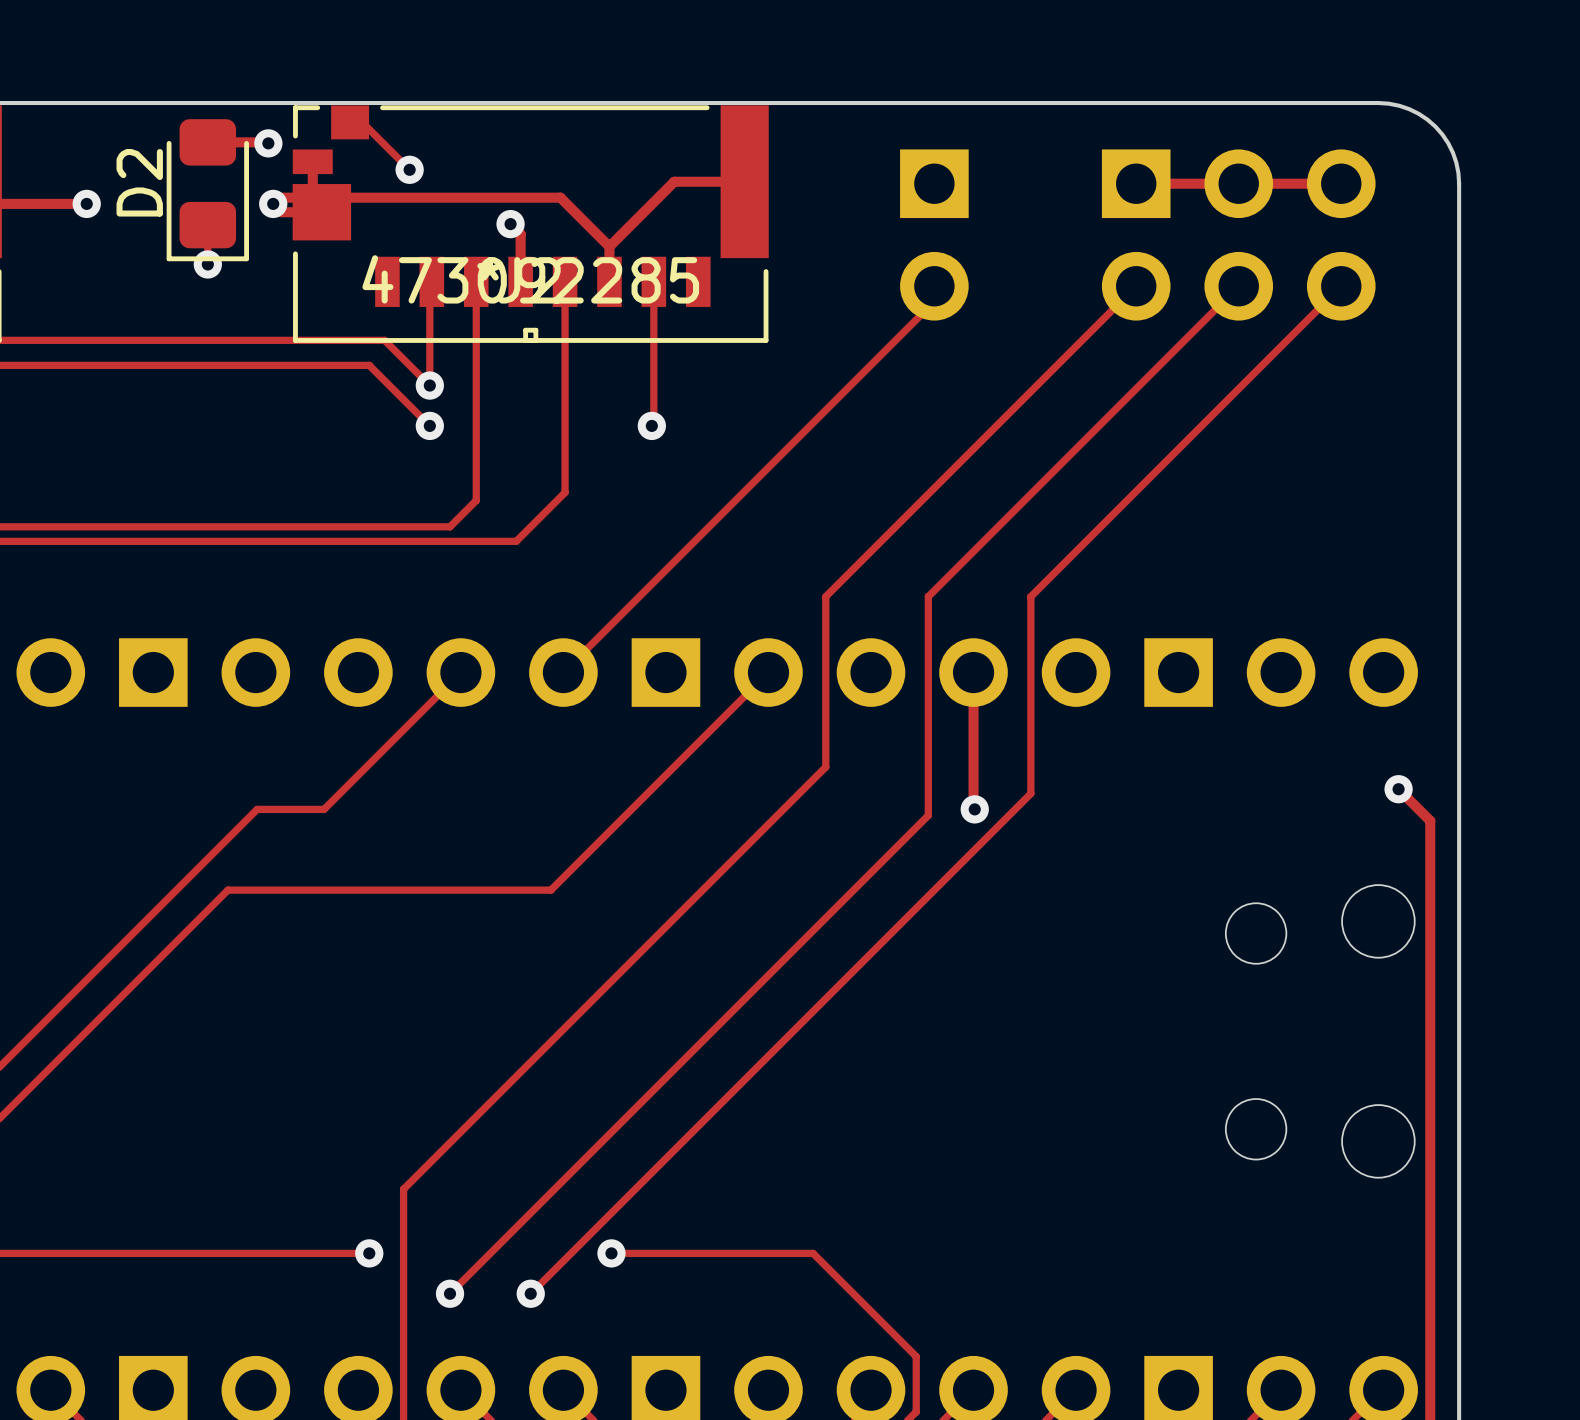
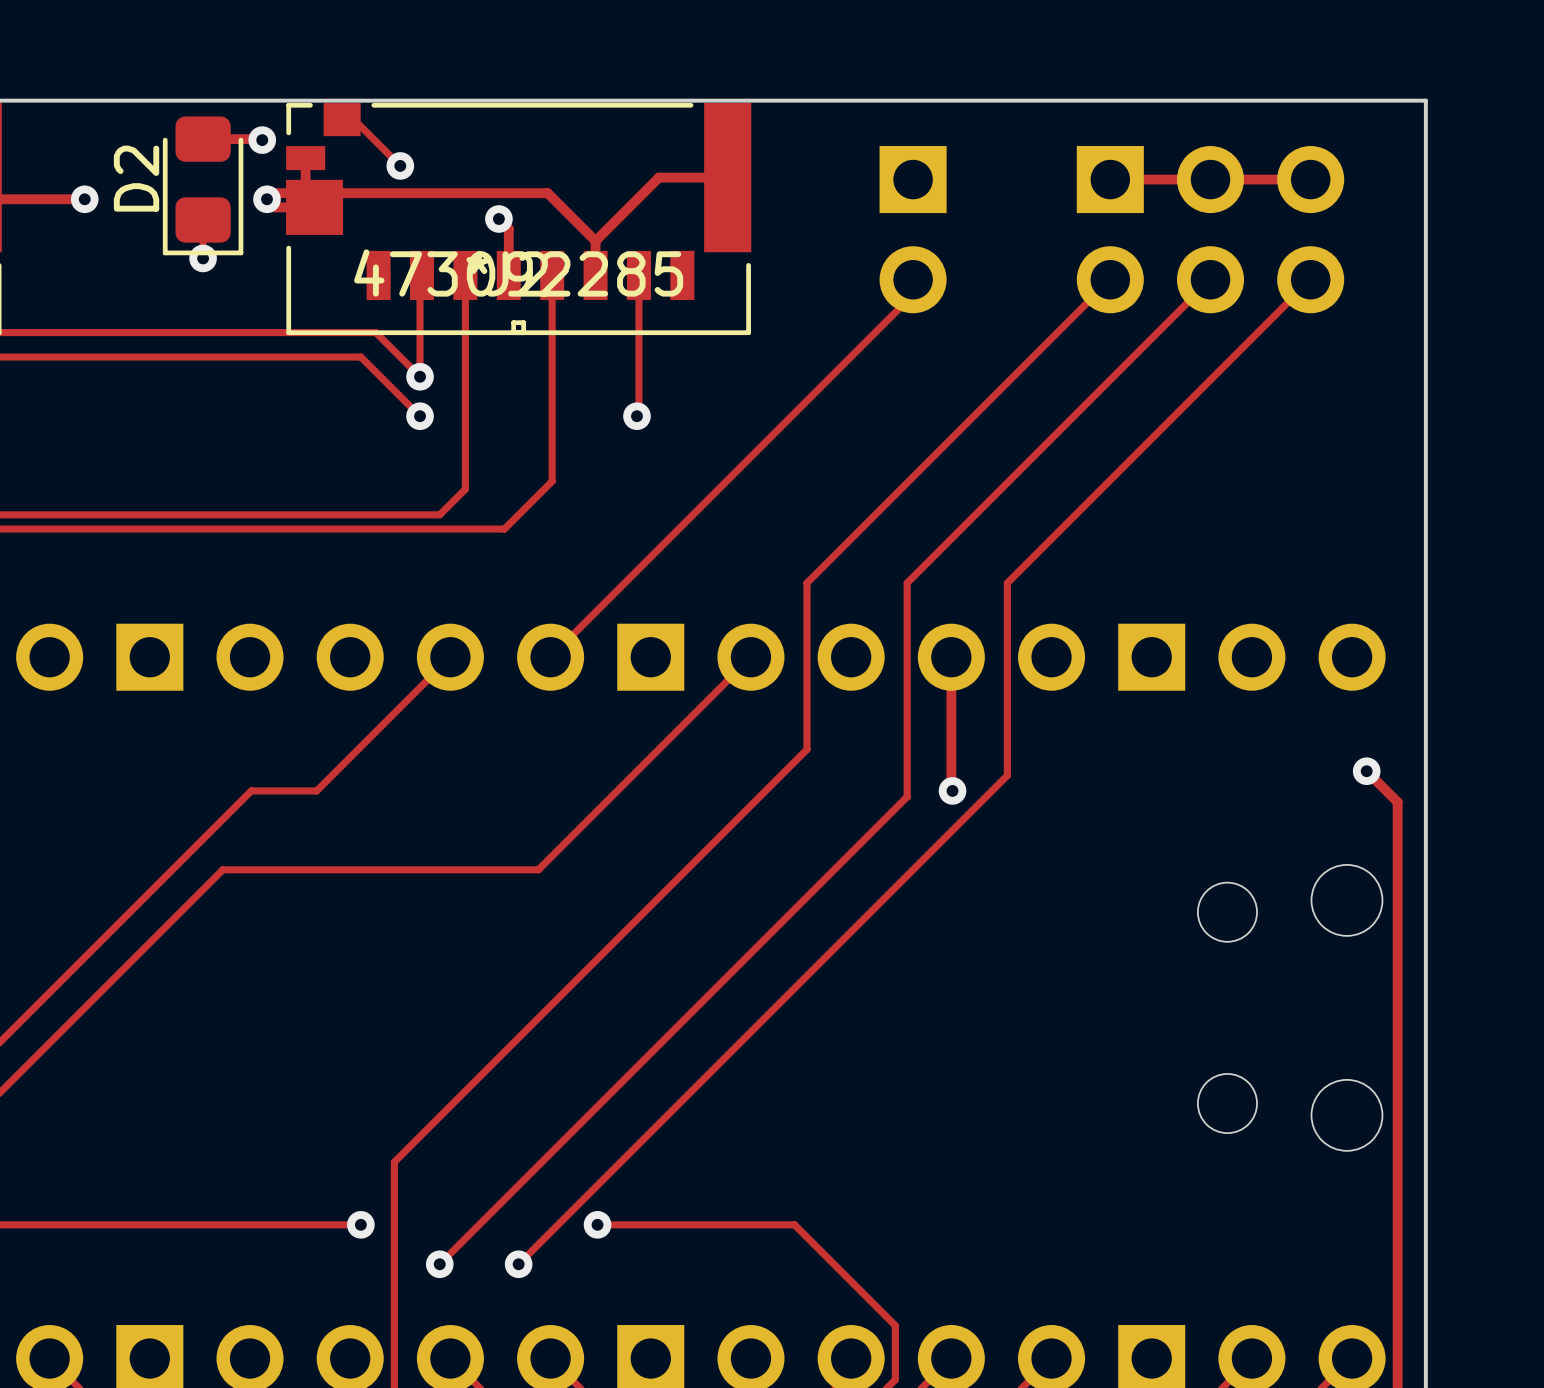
board edge: (1378, 103) (1409, 109) (1435, 126) (1452, 152) (1459, 183) -> (1346, 100) (1425, 100) (1425, 179)

